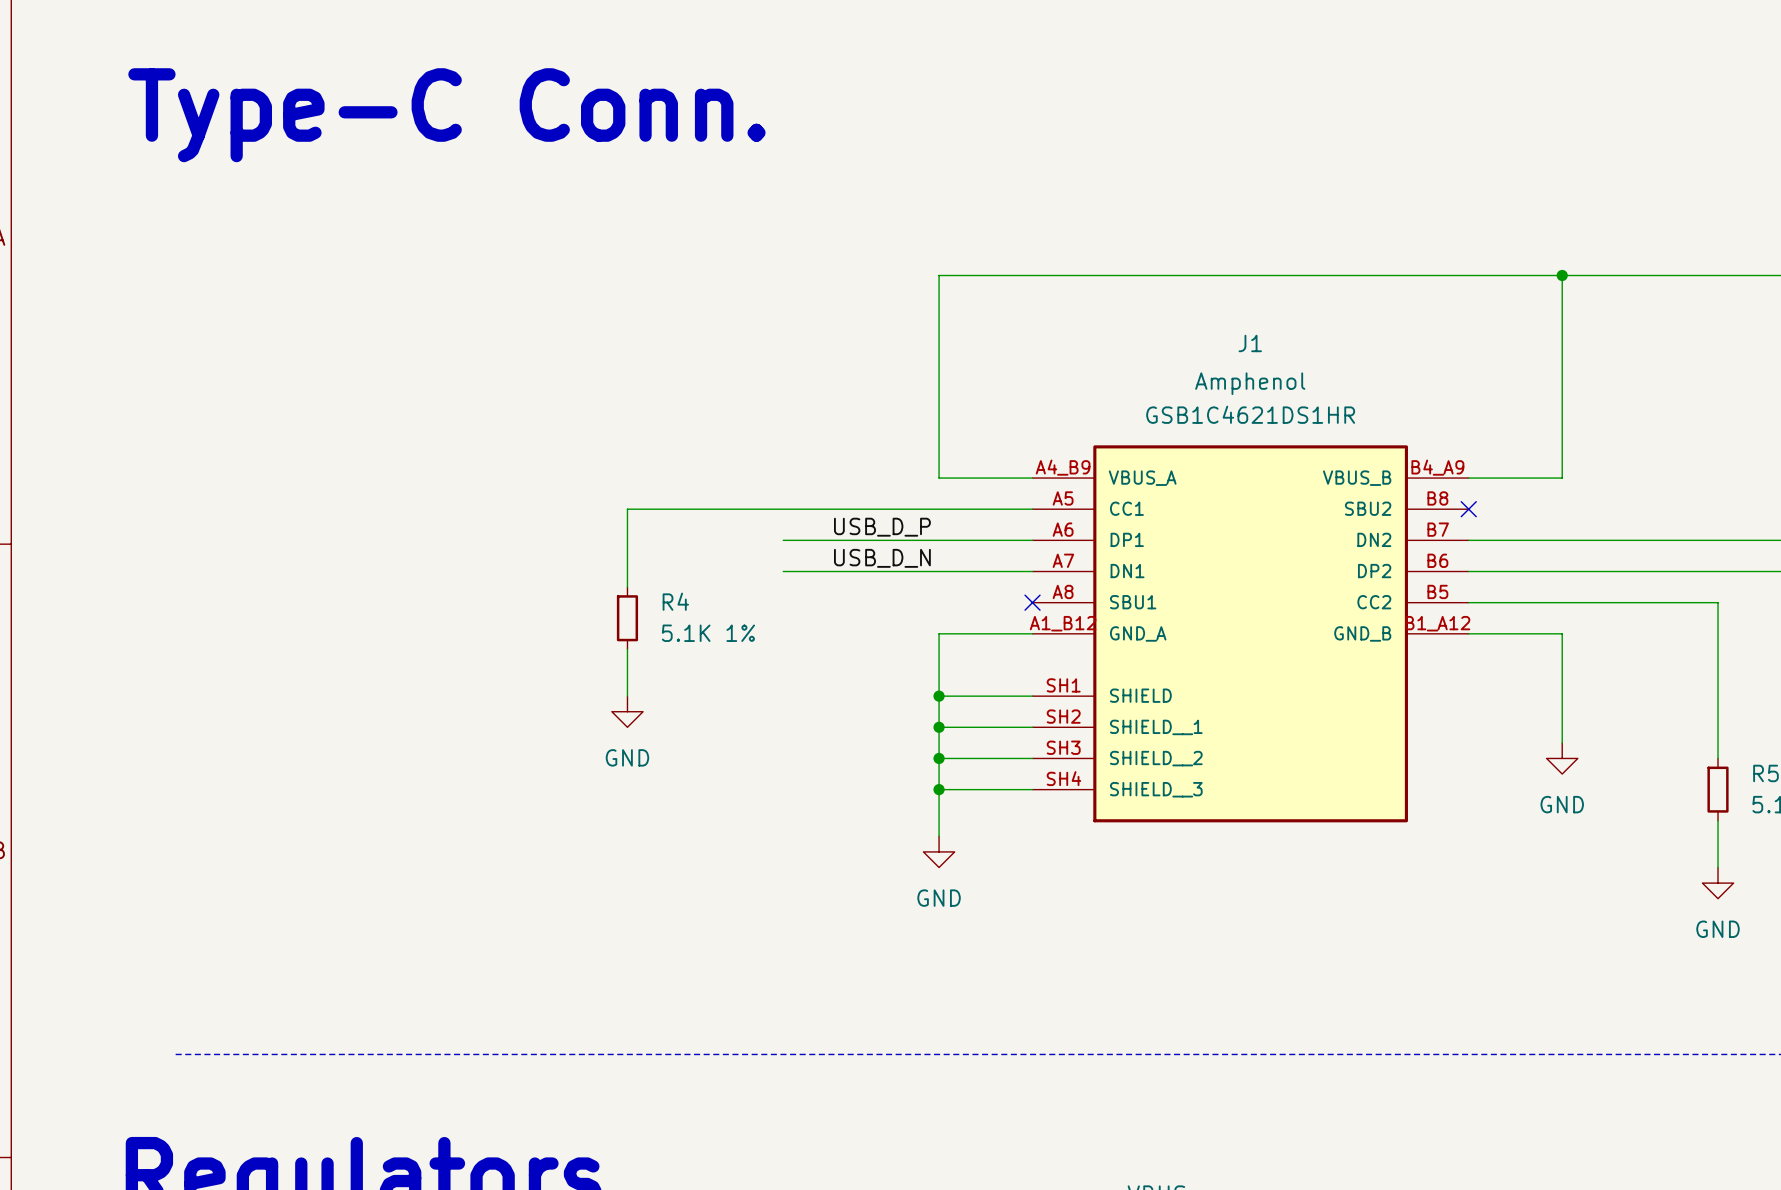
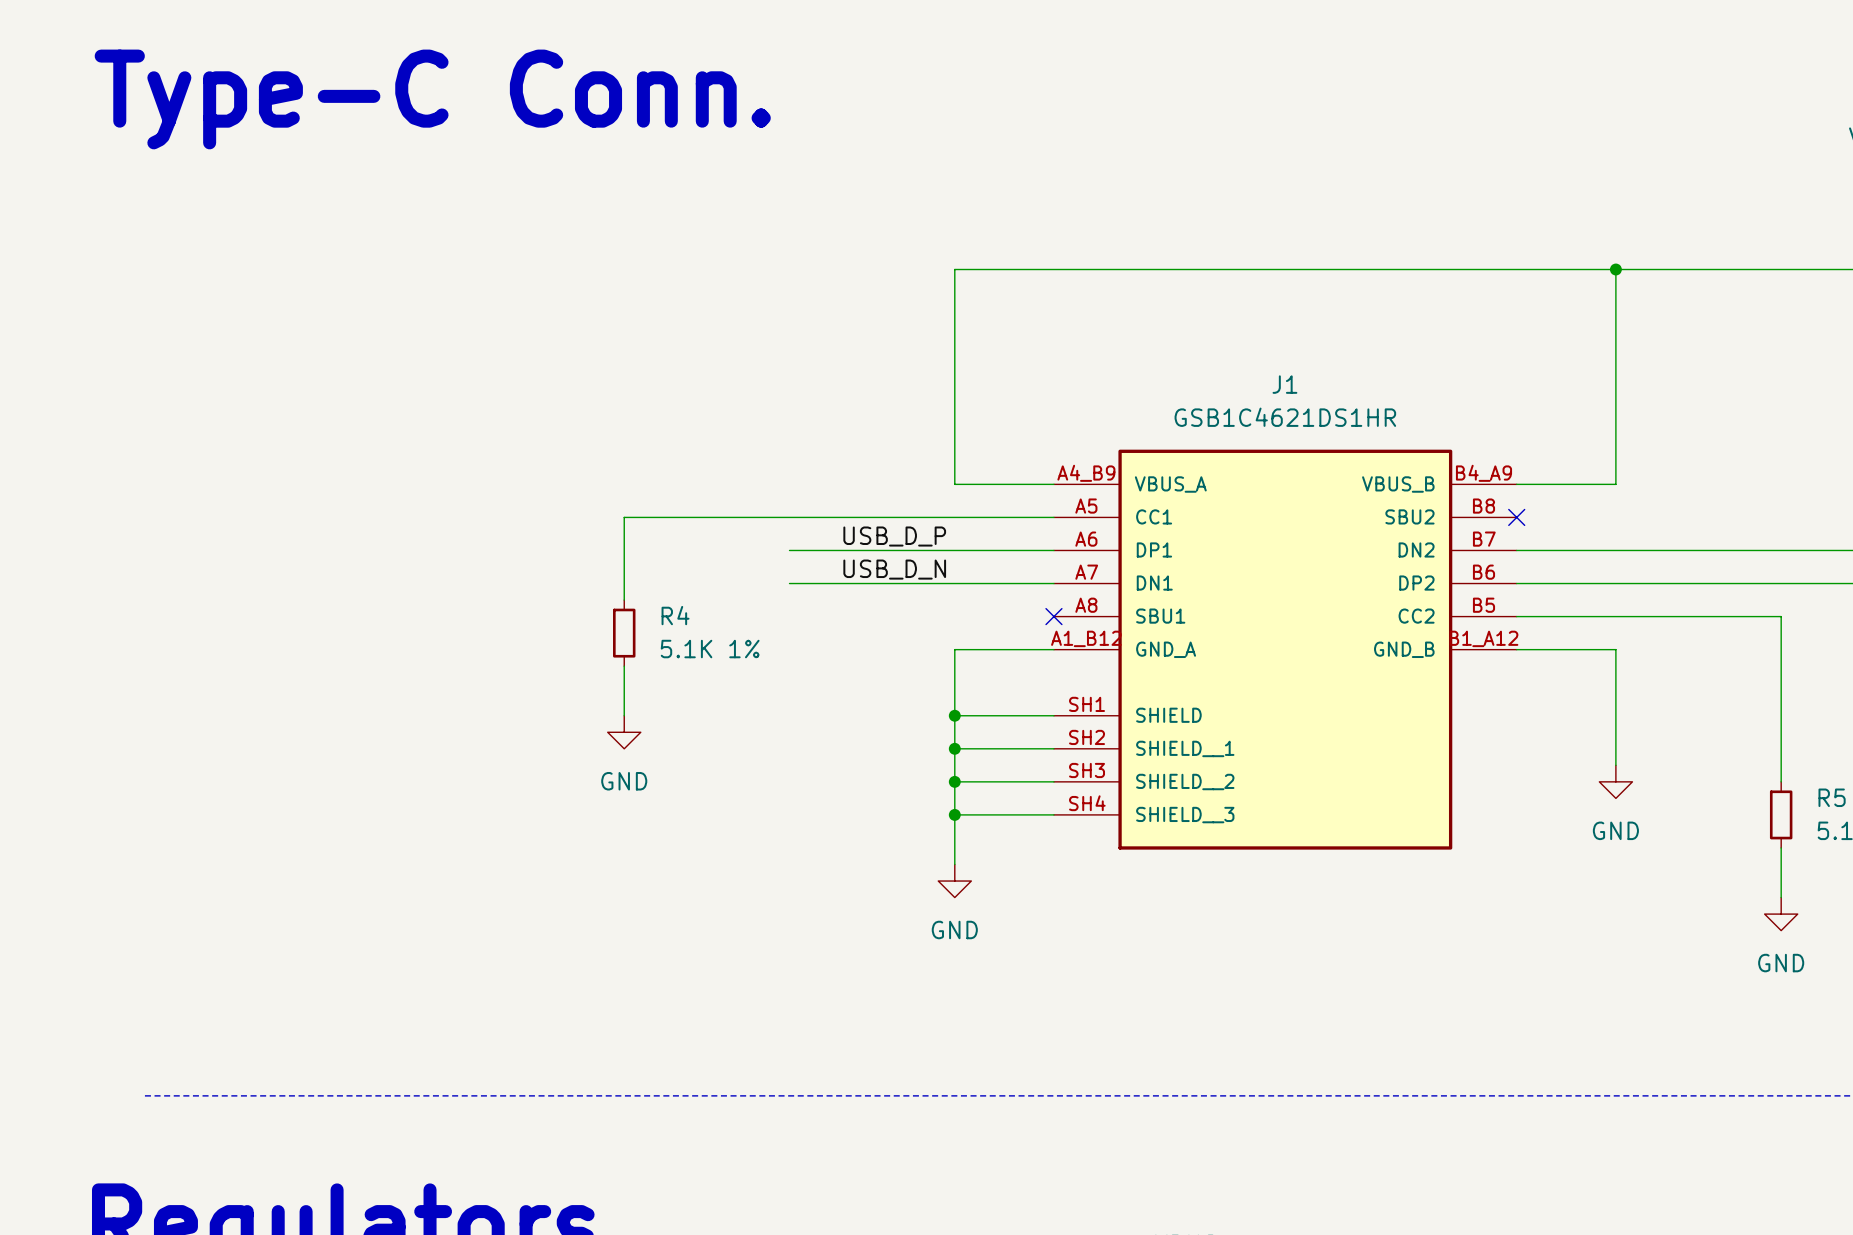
J1 name position: J1 (1250, 343) -> J1 (1284, 384)
J1 text: Amphenol (1250, 383) -> none

